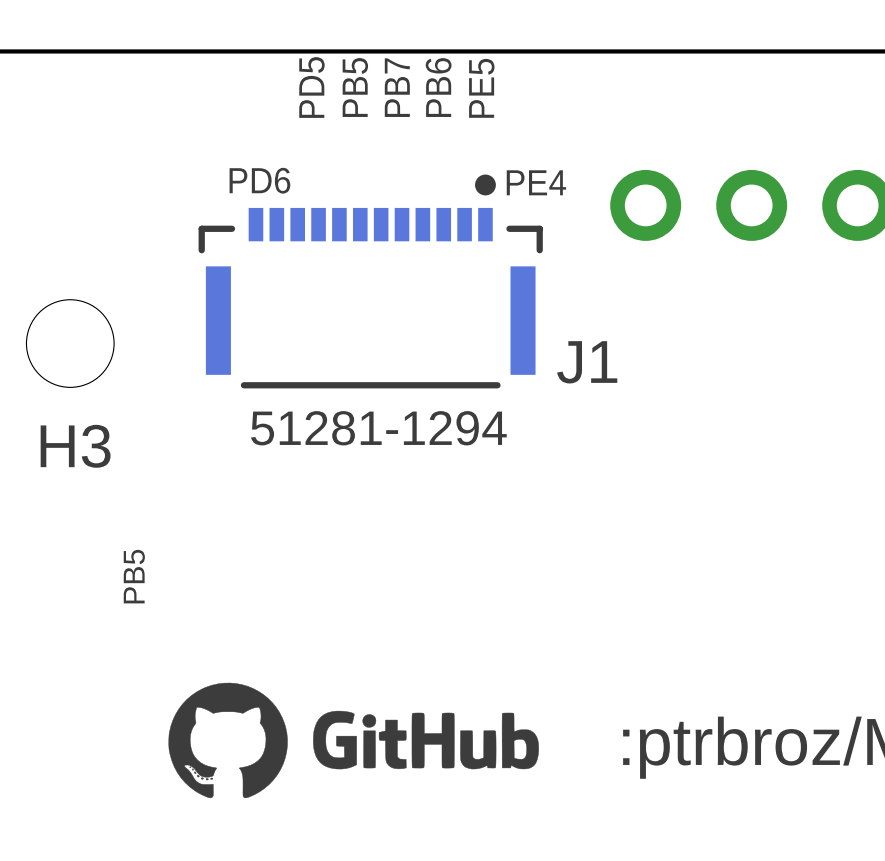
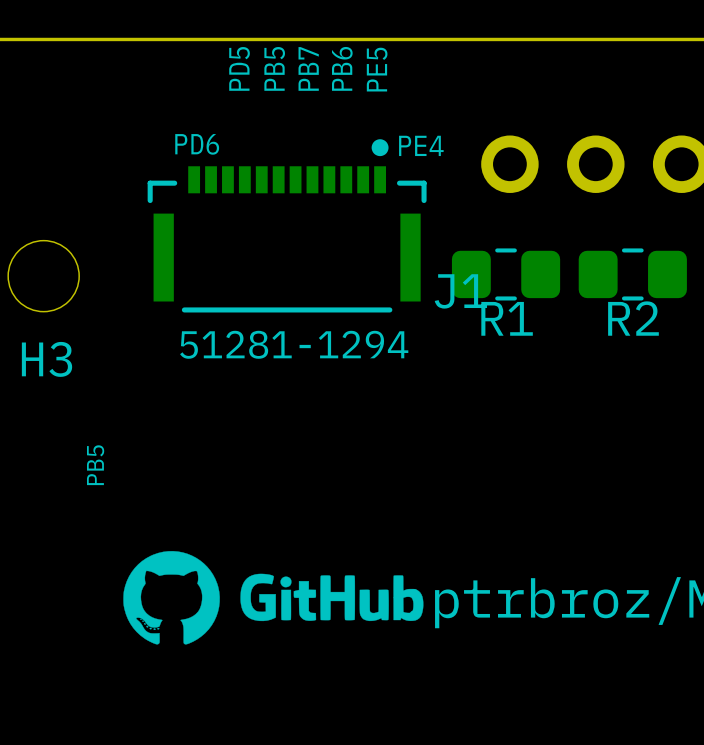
R1: none -> (506, 274)
R2: none -> (632, 274)

